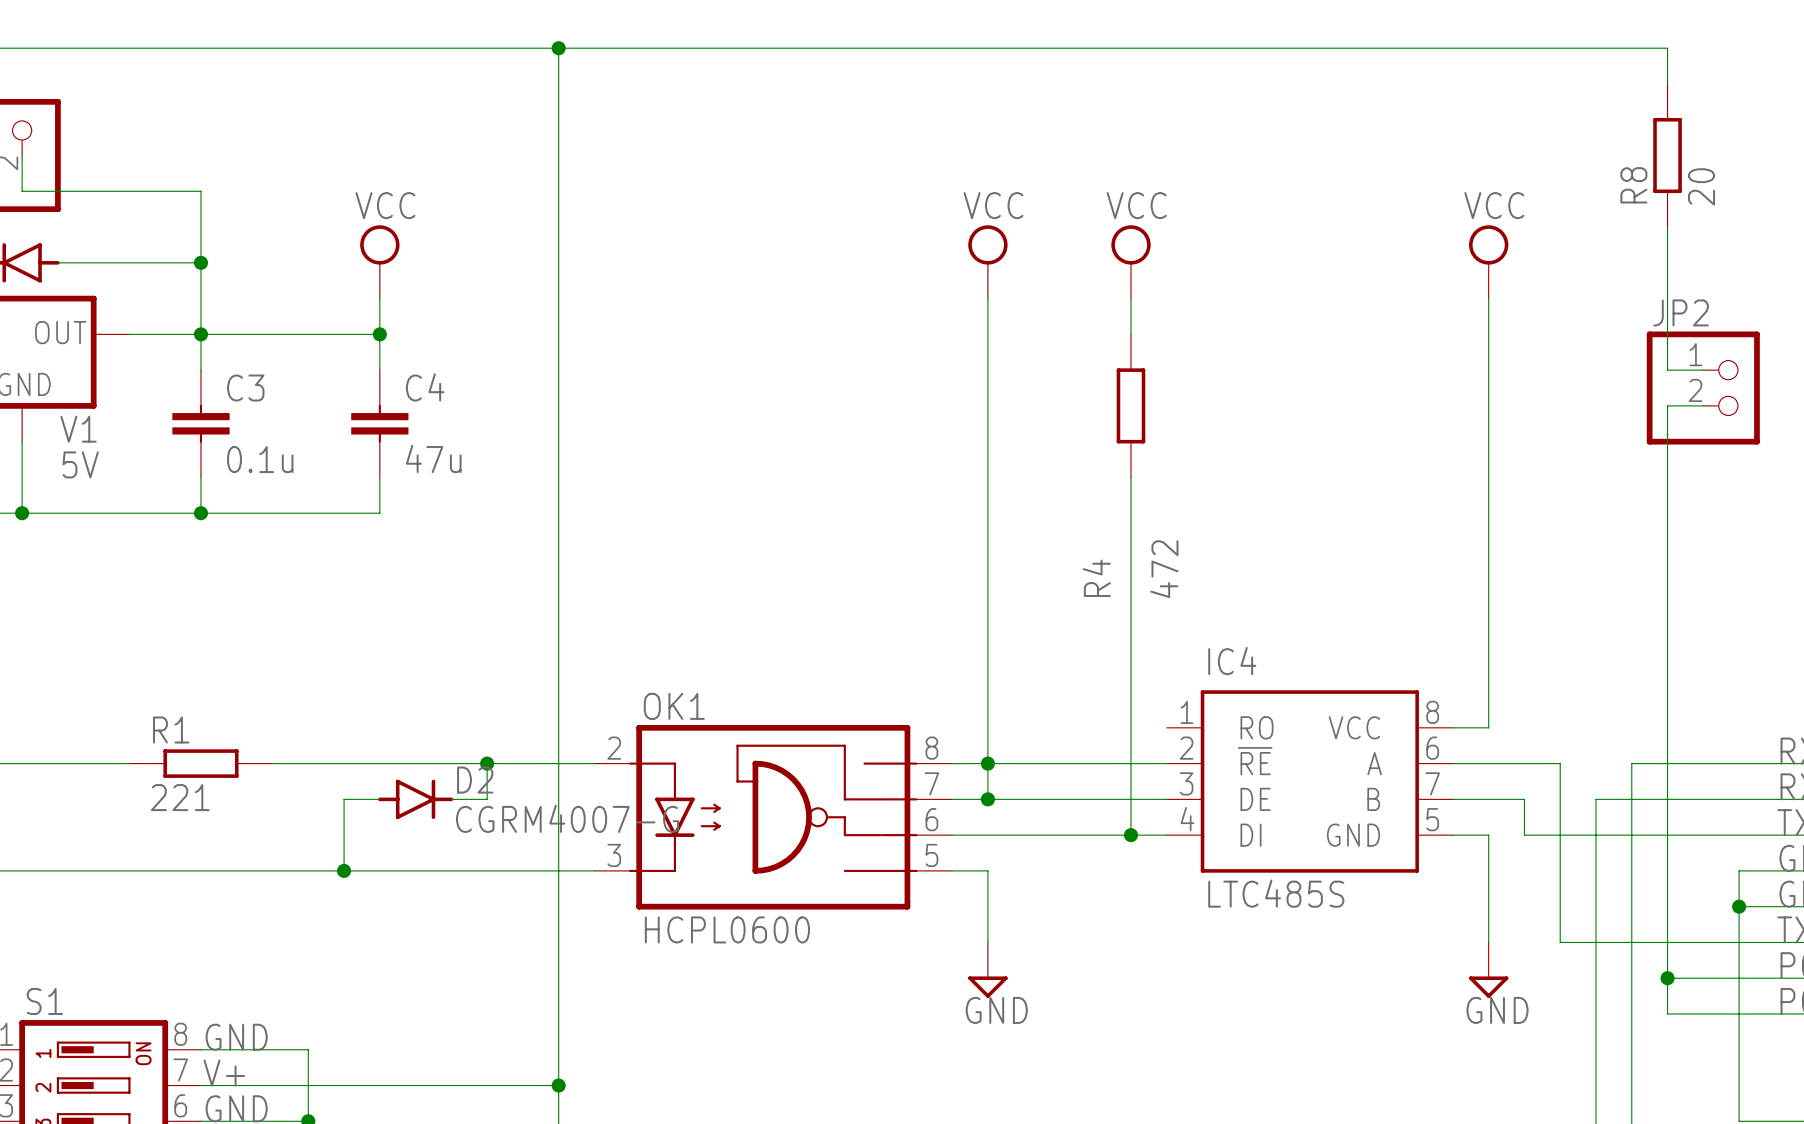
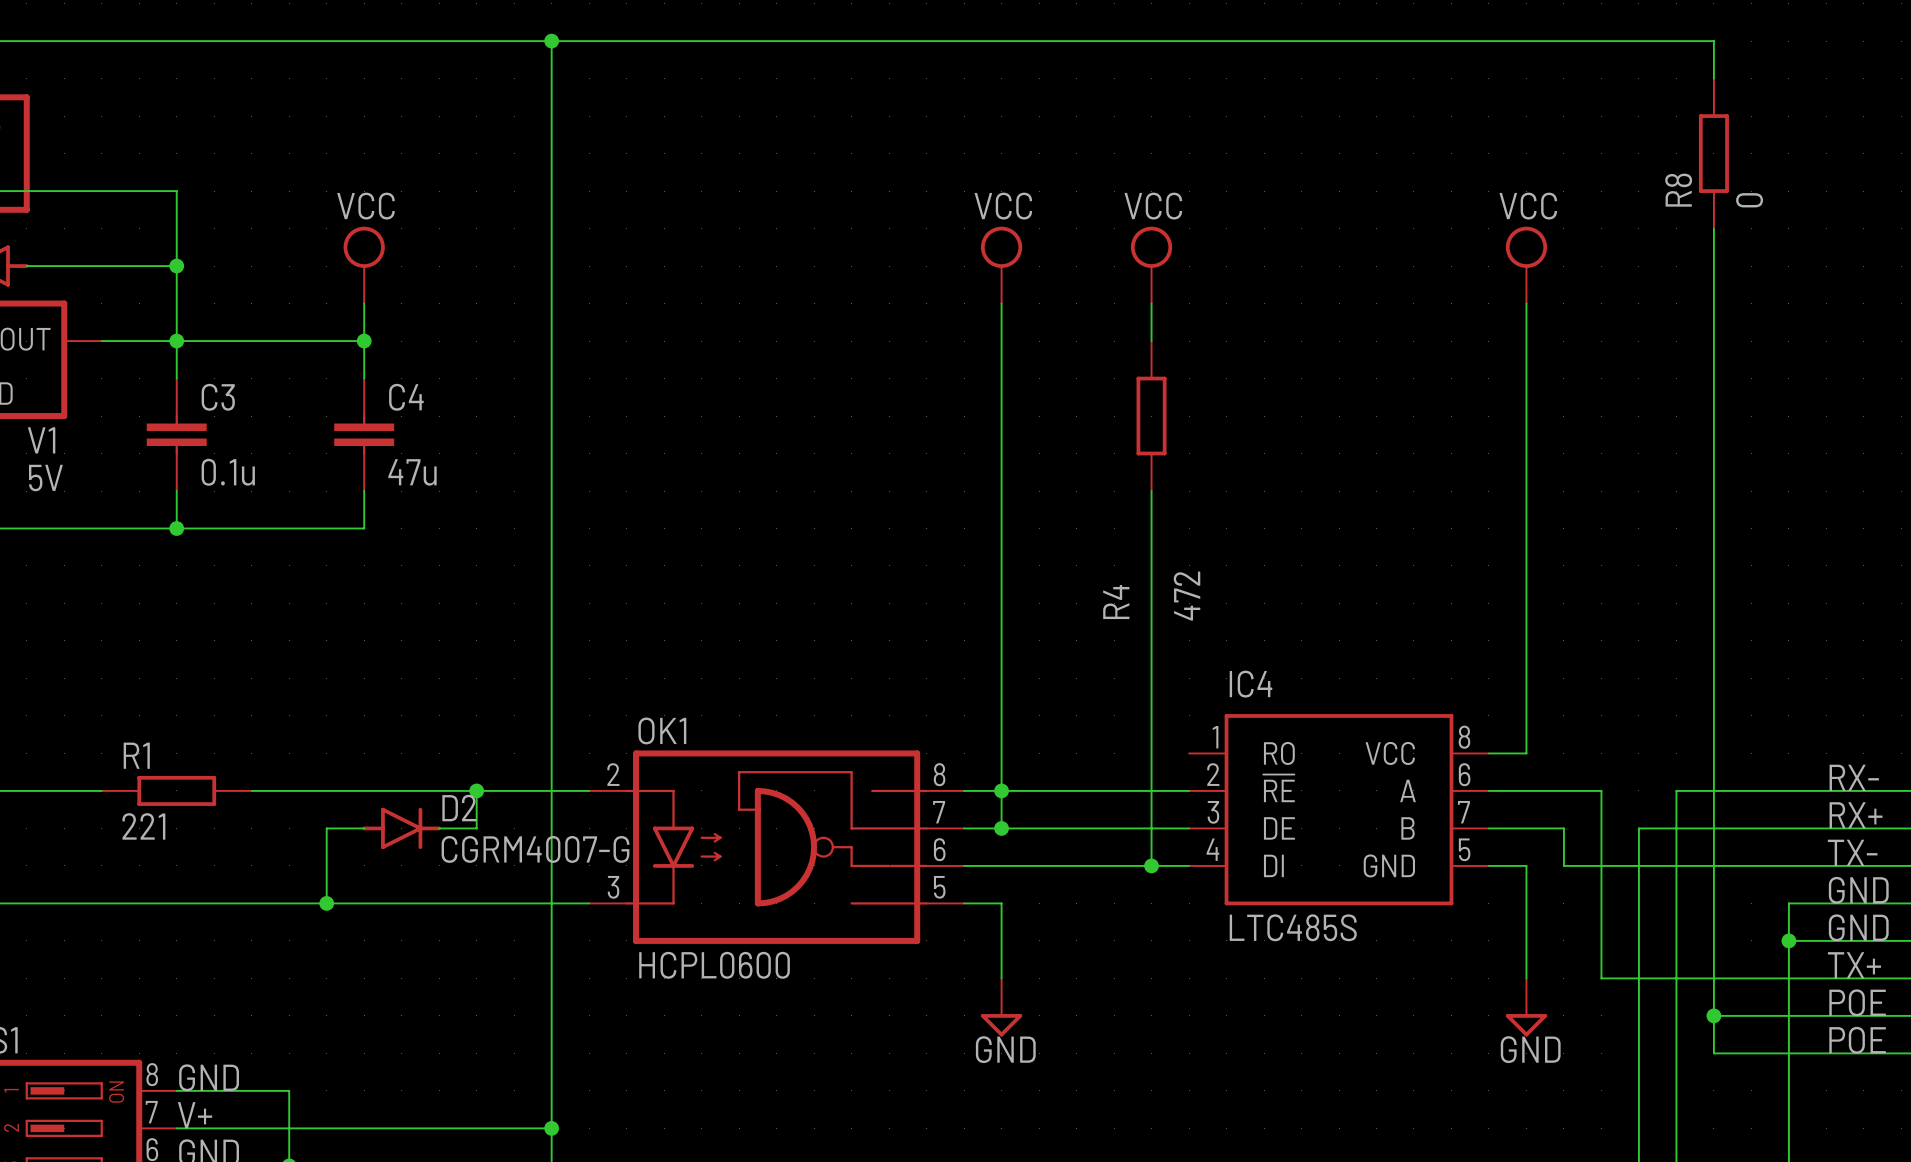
R8 value: 20 (1701, 186) -> 0 (1749, 200)
wire: (1667, 370) (1703, 370) -> (1713, 378) (1713, 416)
JP2: (1703, 388) -> none
wire: (1667, 405) (1703, 405) -> none

